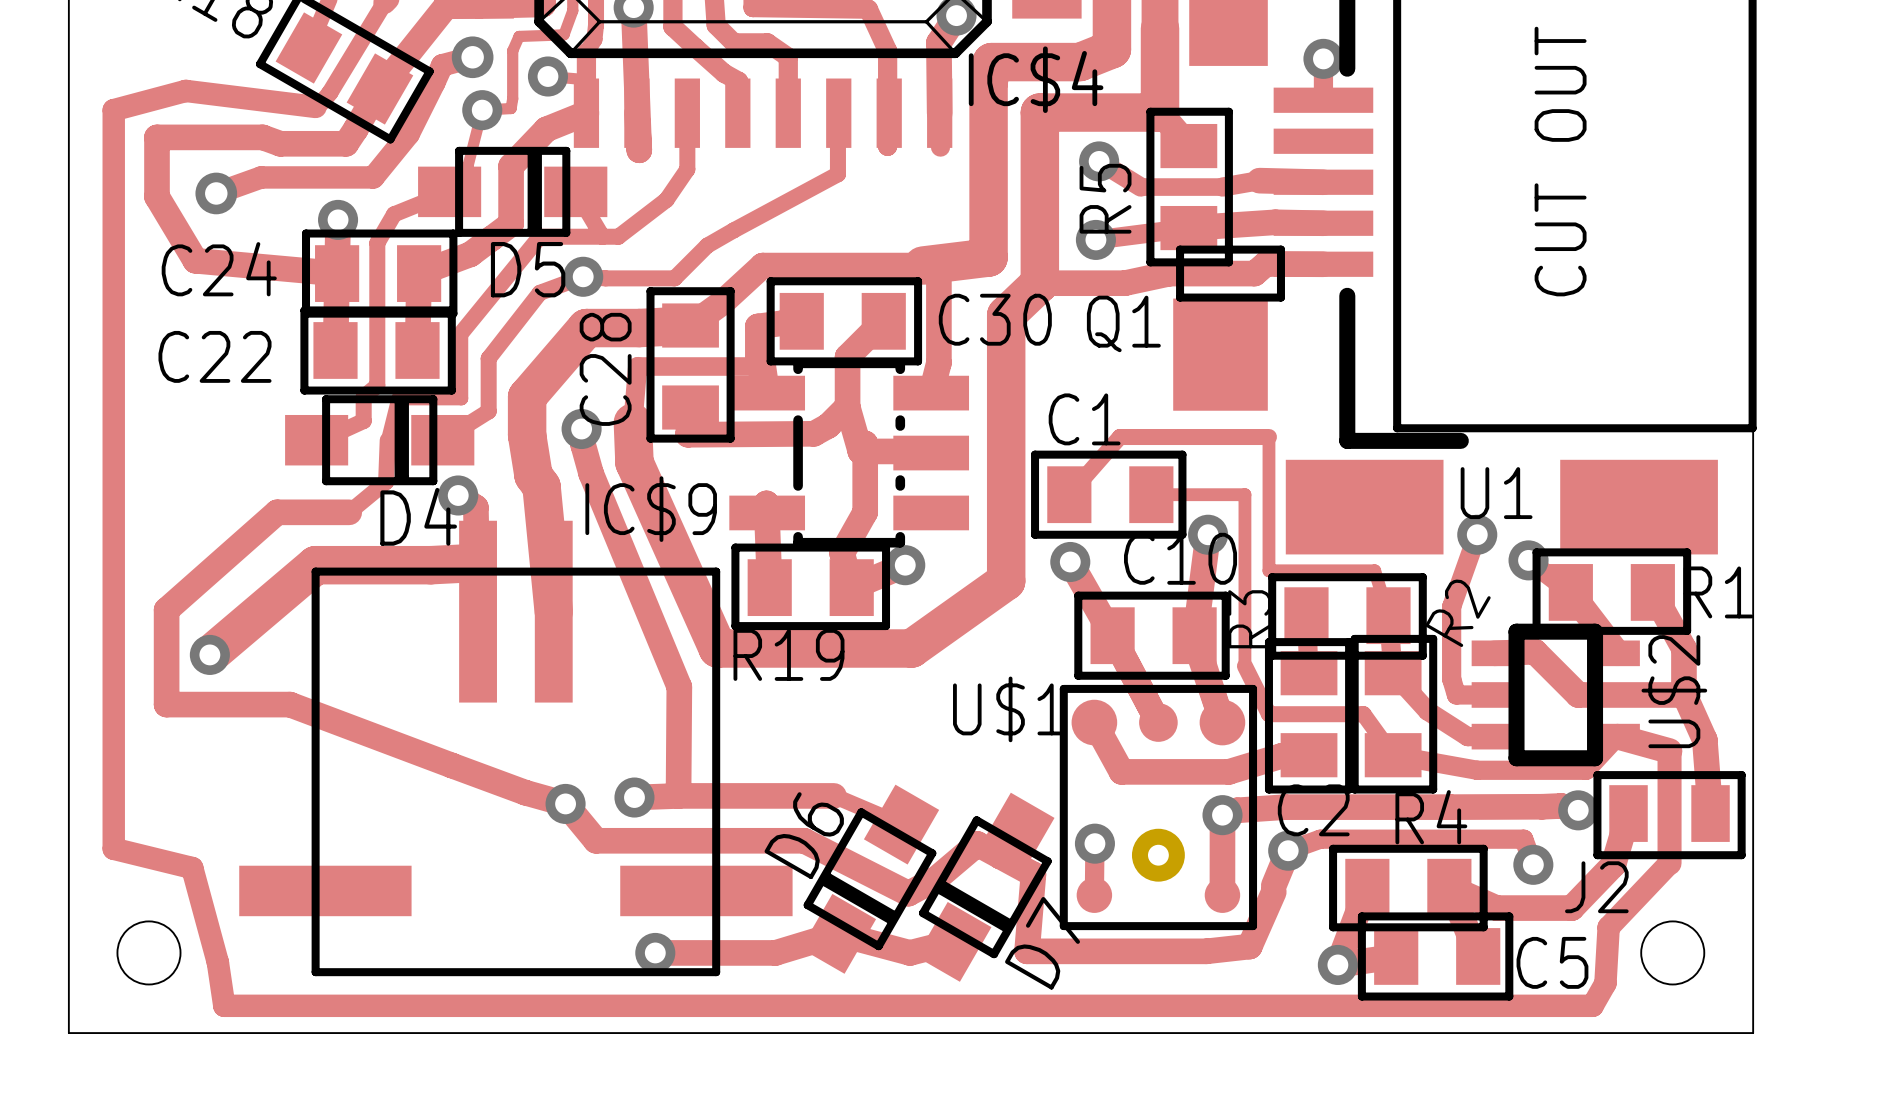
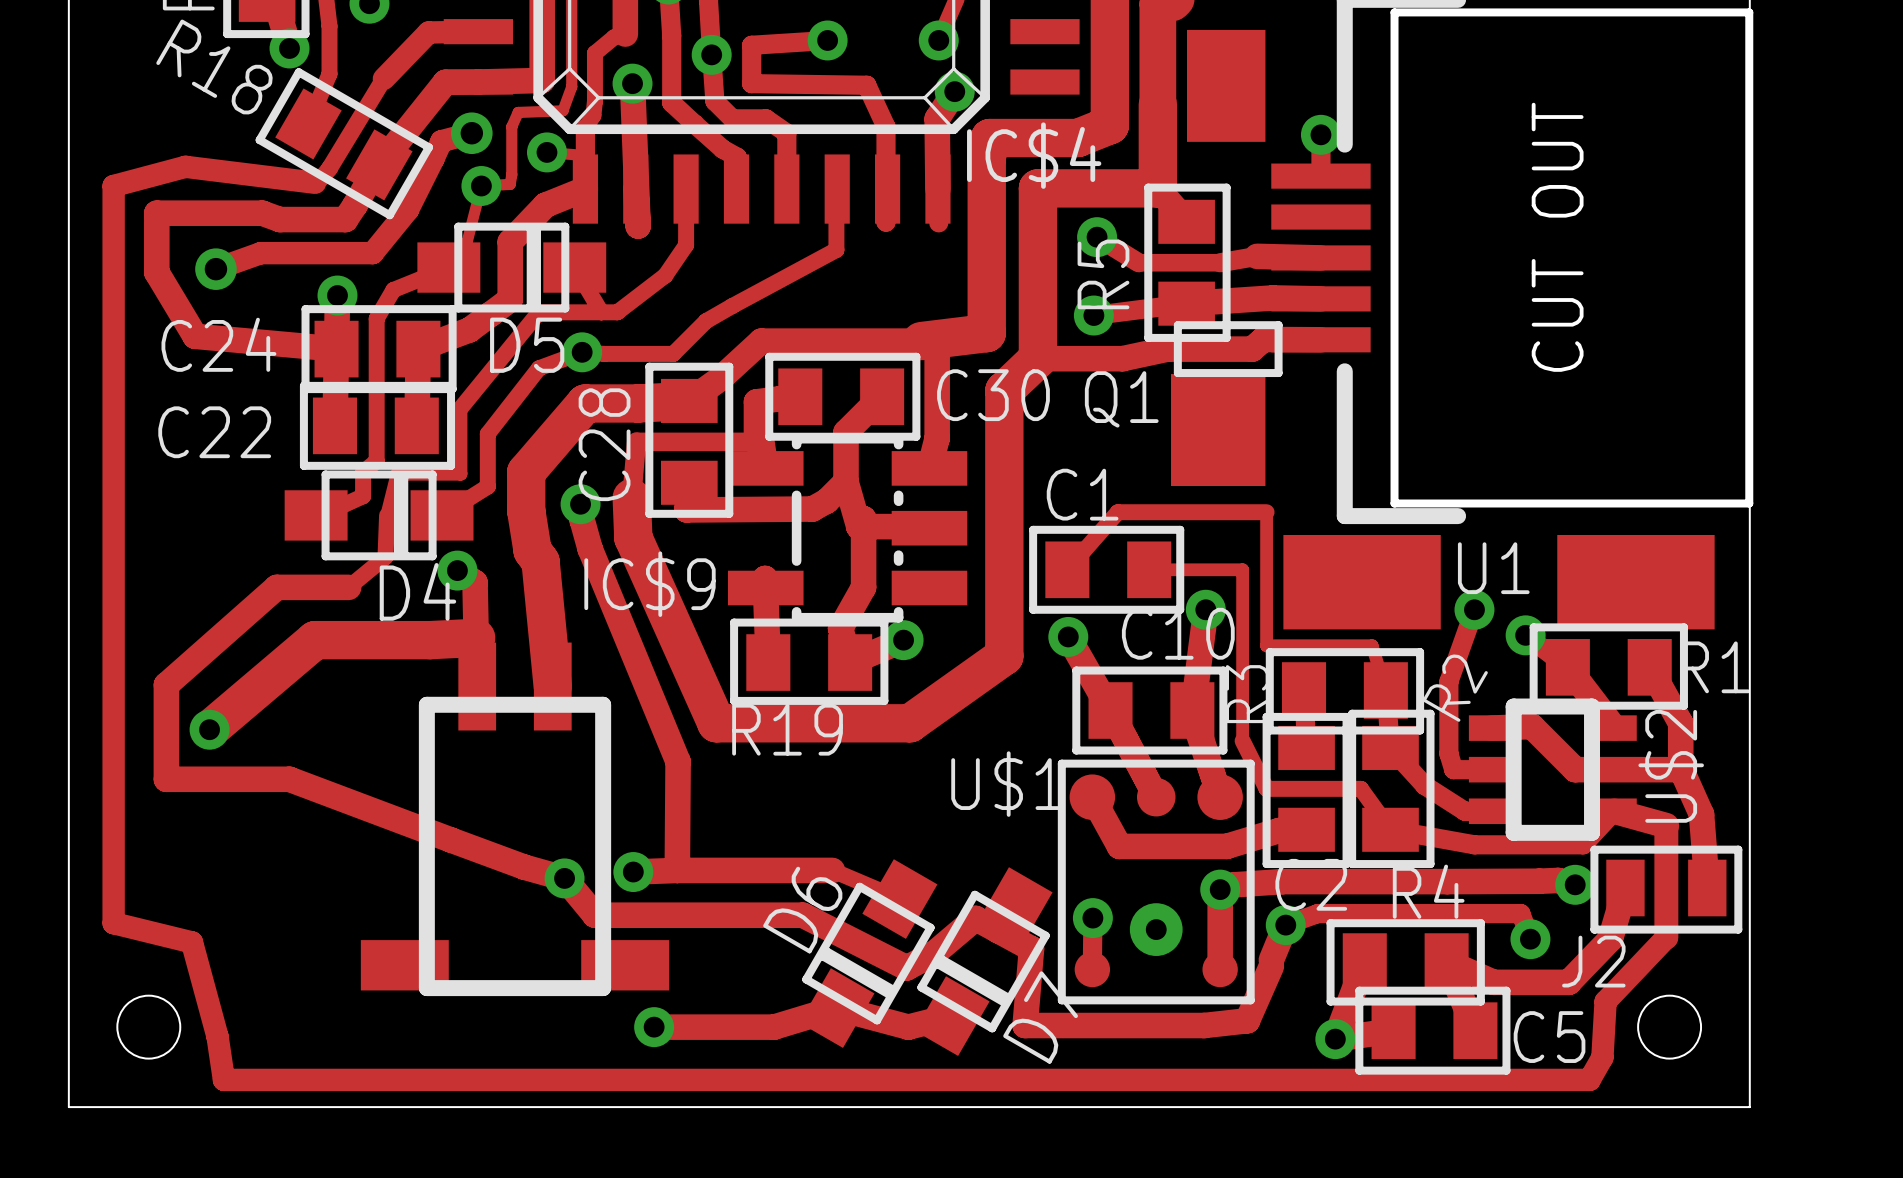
part footprint: [239, 520, 793, 977] -> [360, 642, 670, 997]

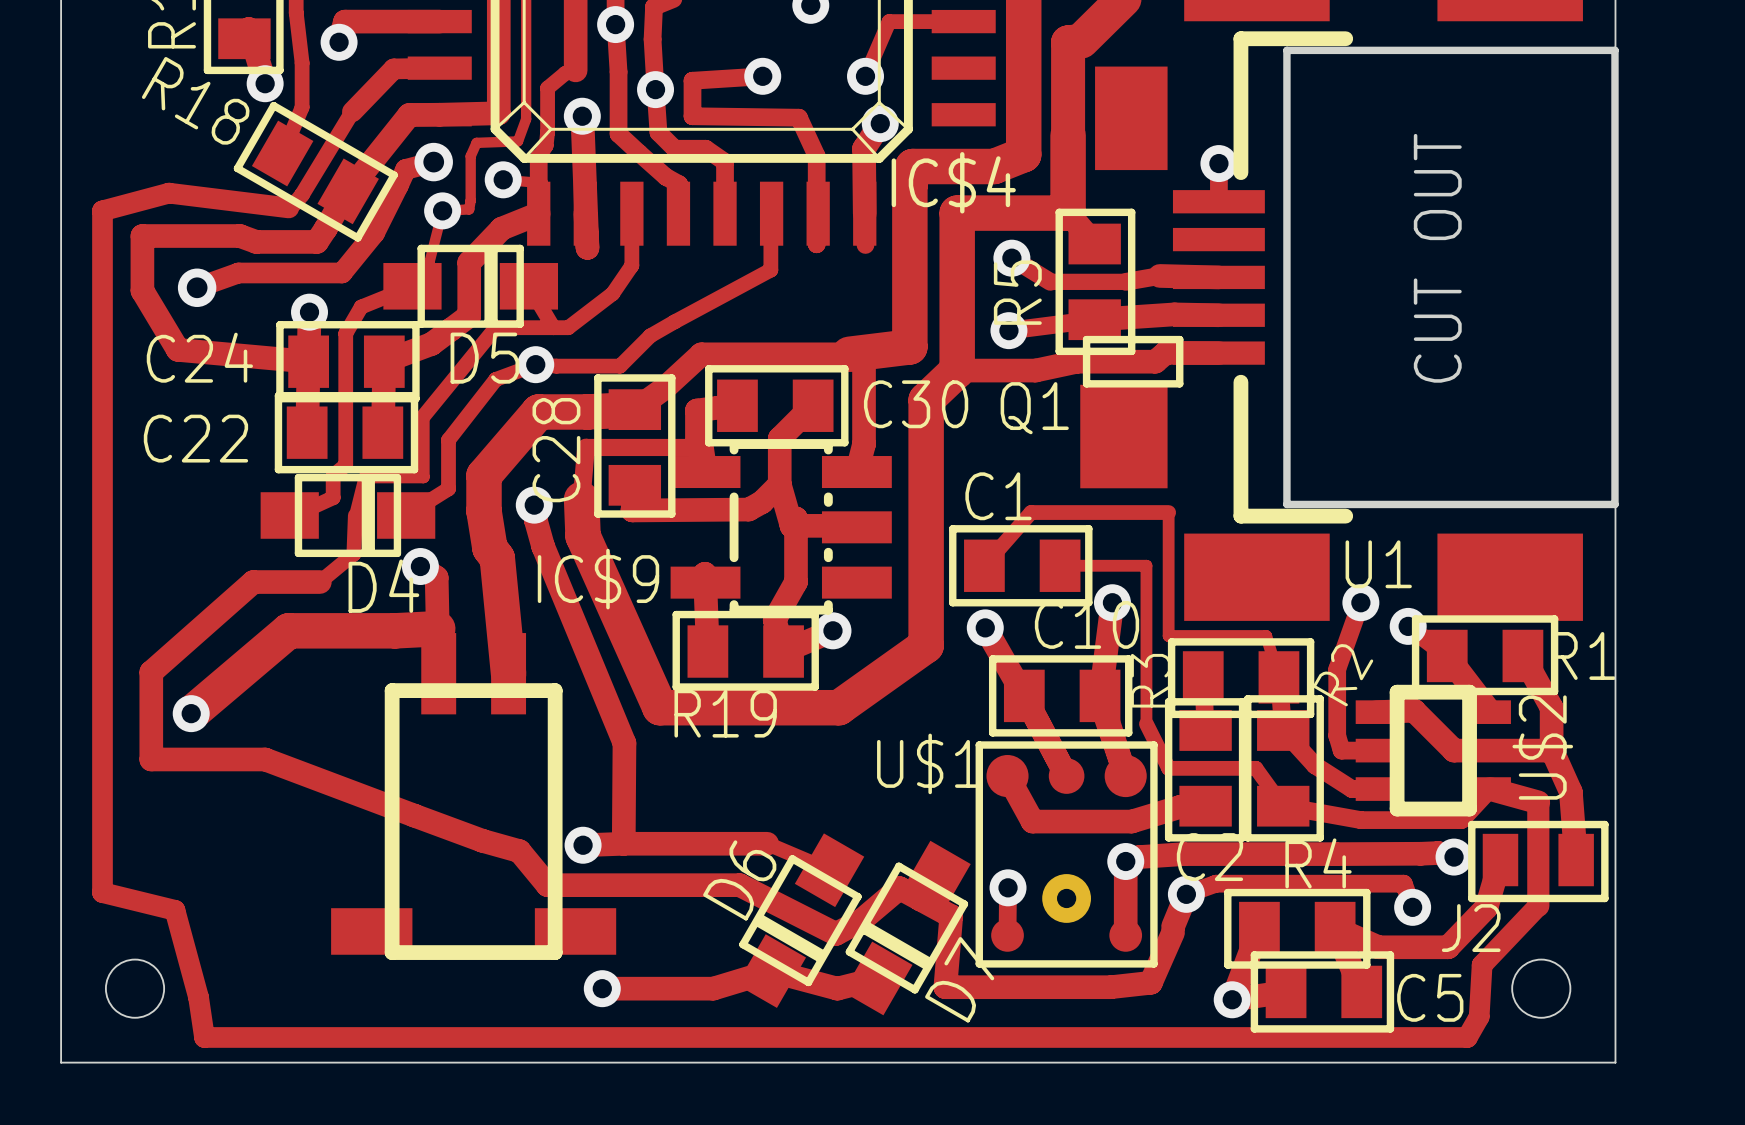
via: (564, 878) -> none

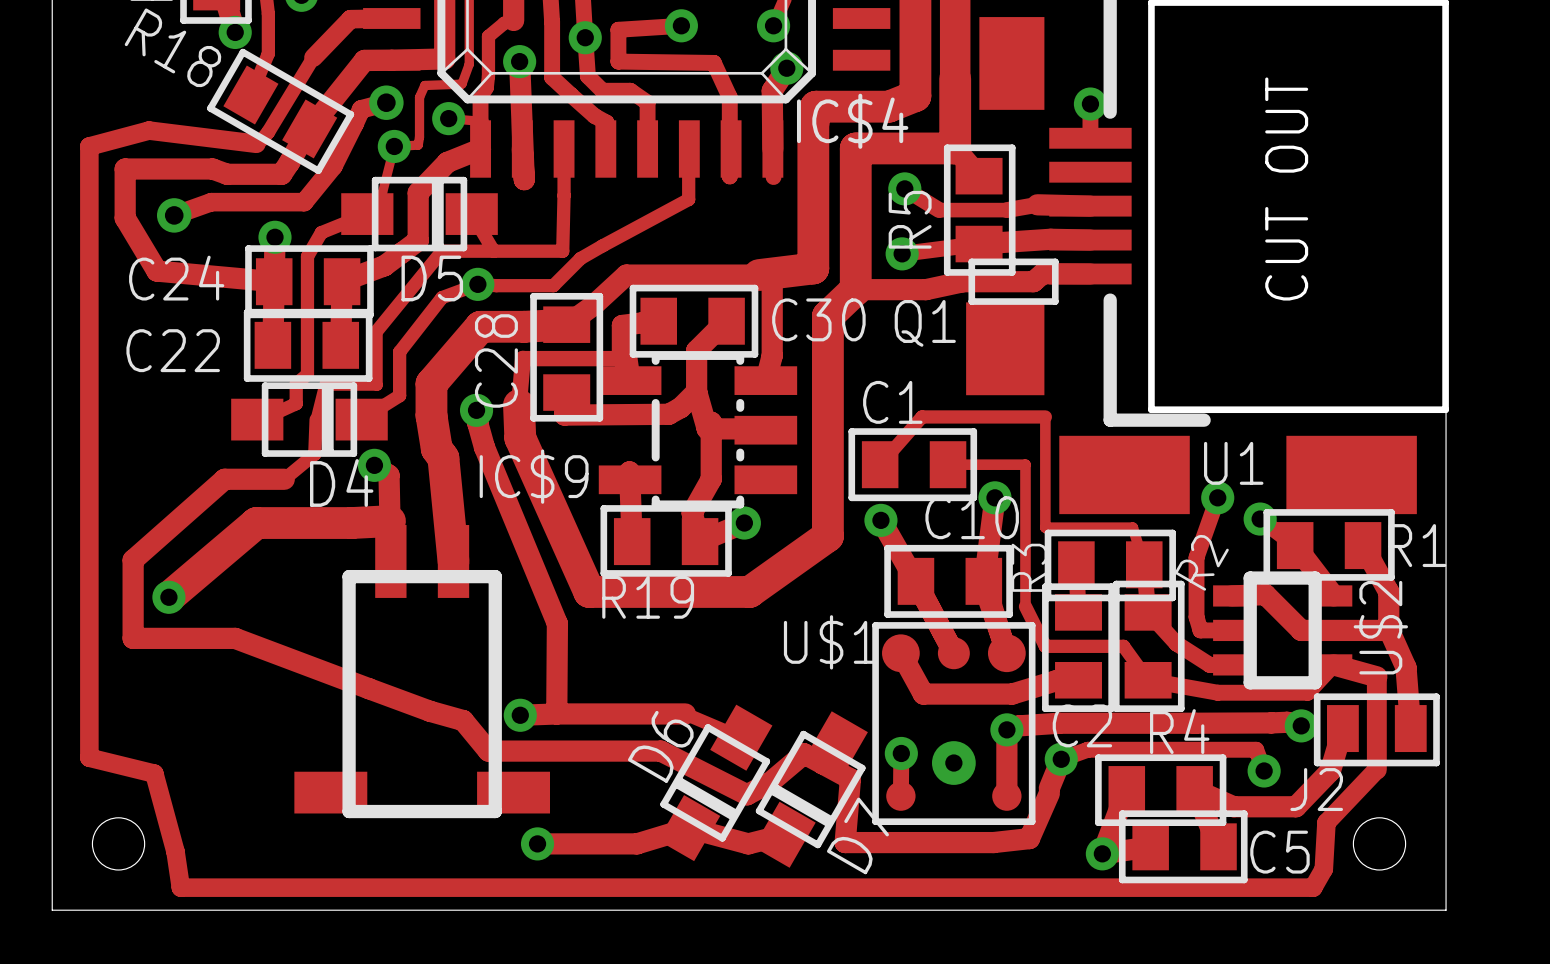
track: (631, 265) (612, 293) (568, 327) -> (564, 195) (562, 251) (507, 251)

